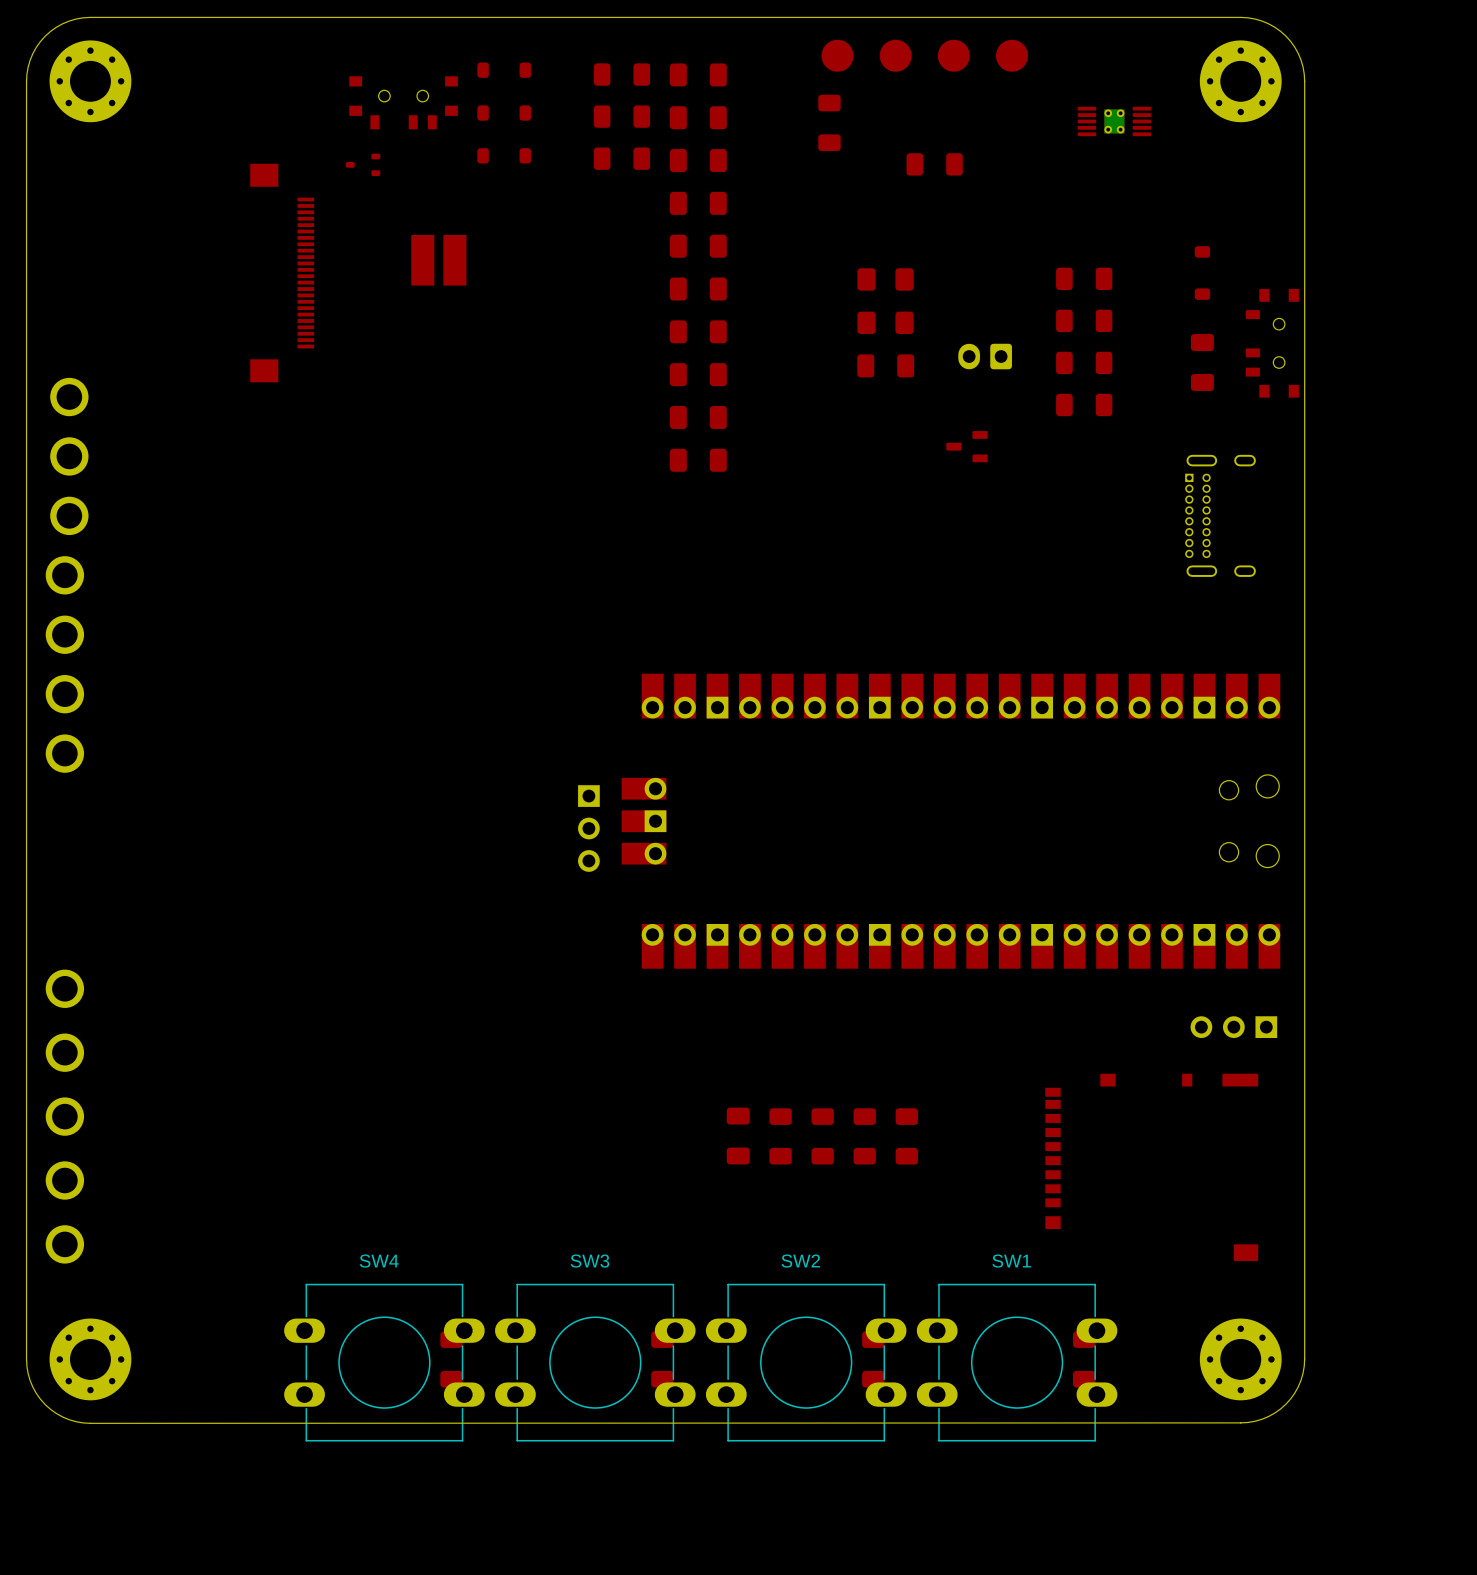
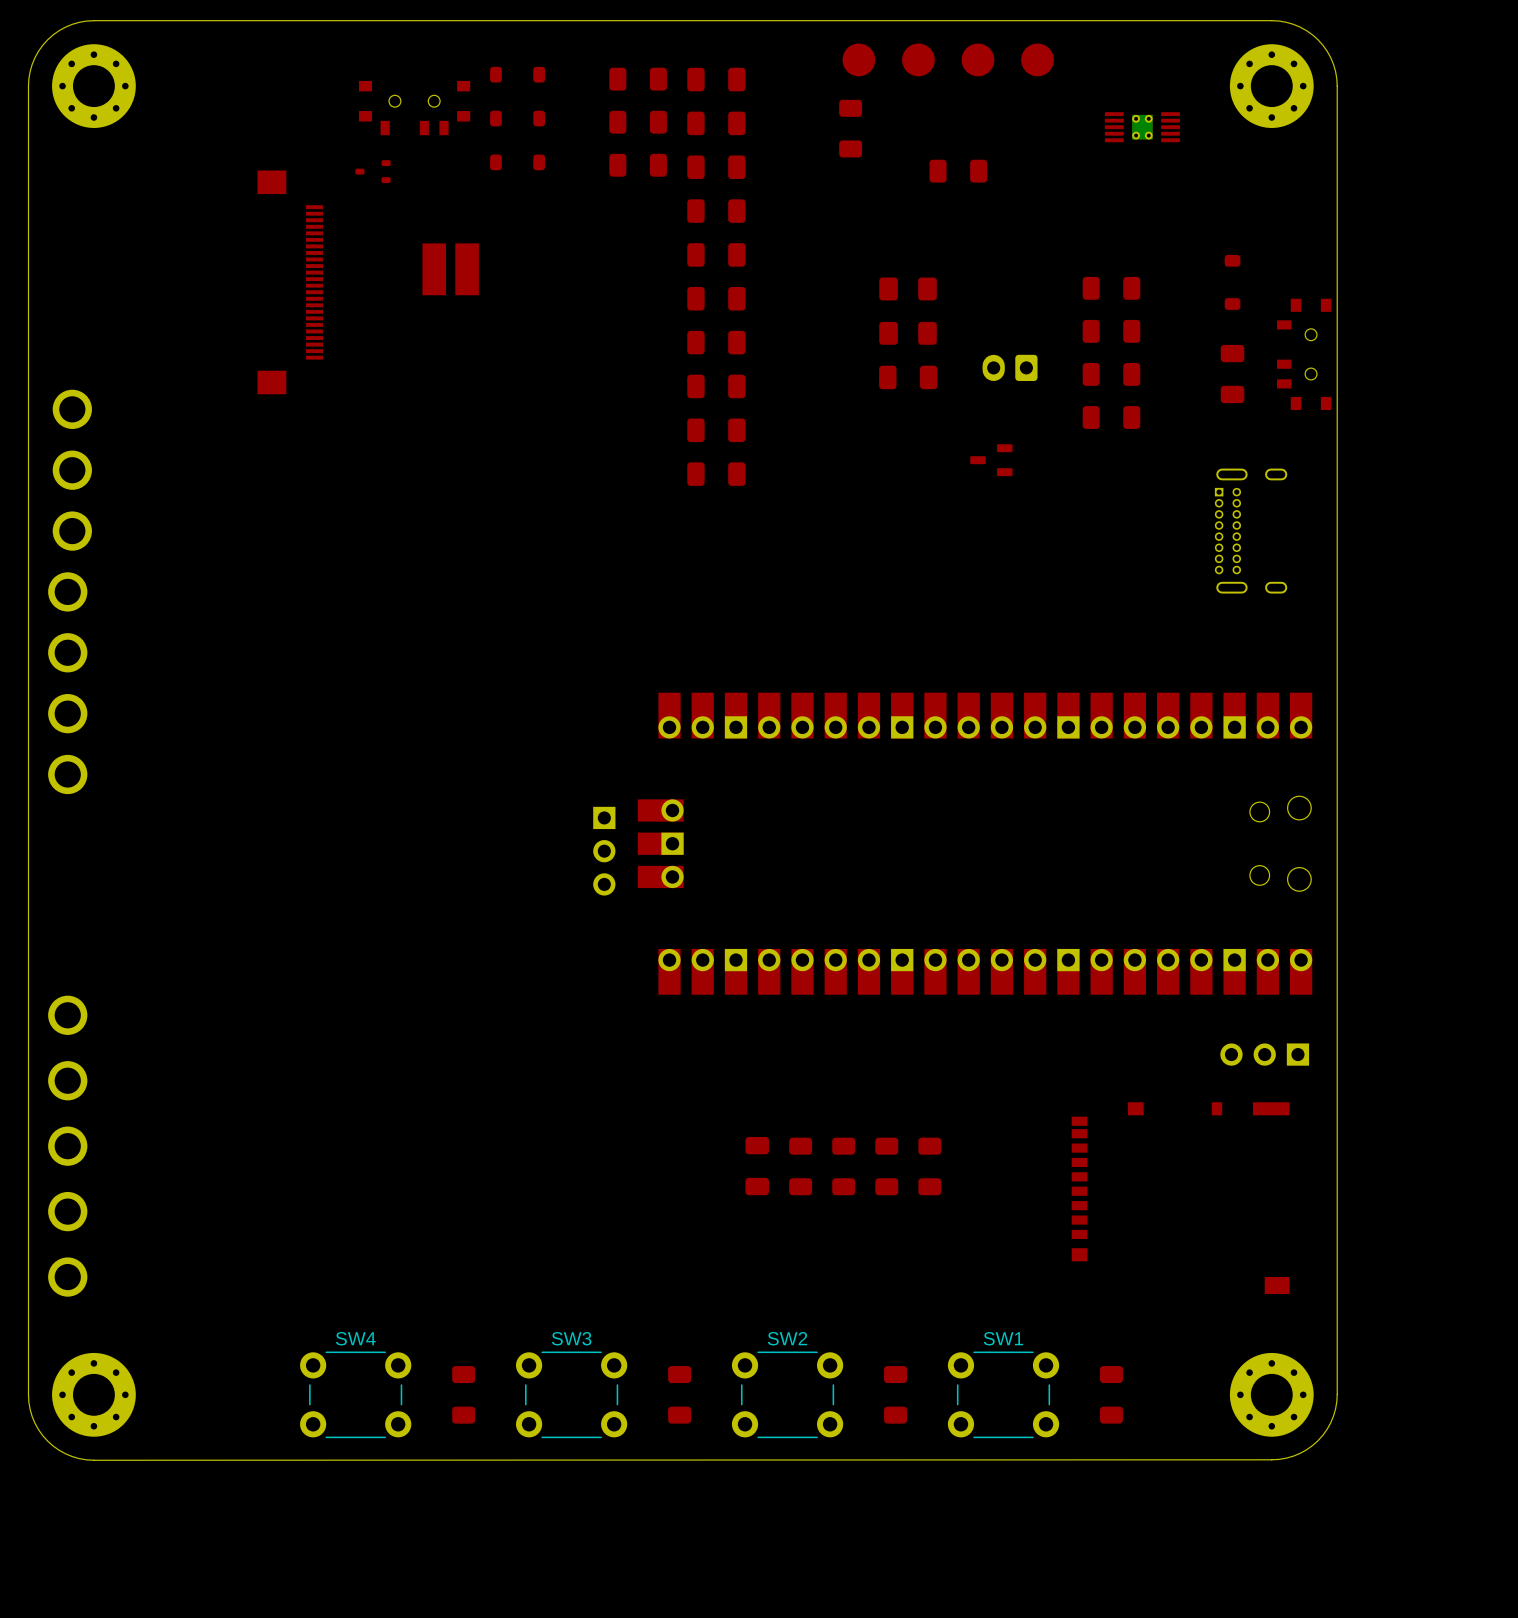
SW4 name position: SW4 (379, 1261) -> SW4 (355, 1338)
SW3 name position: SW3 (589, 1261) -> SW3 (571, 1338)
SW2 name position: SW2 (800, 1261) -> SW2 (787, 1338)
SW1 name position: SW1 (1011, 1261) -> SW1 (1003, 1338)
SW4 footprint: [284, 1283, 485, 1442] -> [300, 1351, 412, 1439]
SW3 footprint: [494, 1283, 696, 1442] -> [515, 1351, 628, 1439]
SW2 footprint: [705, 1283, 907, 1442] -> [731, 1351, 844, 1439]
SW1 footprint: [916, 1283, 1118, 1442] -> [947, 1351, 1060, 1439]

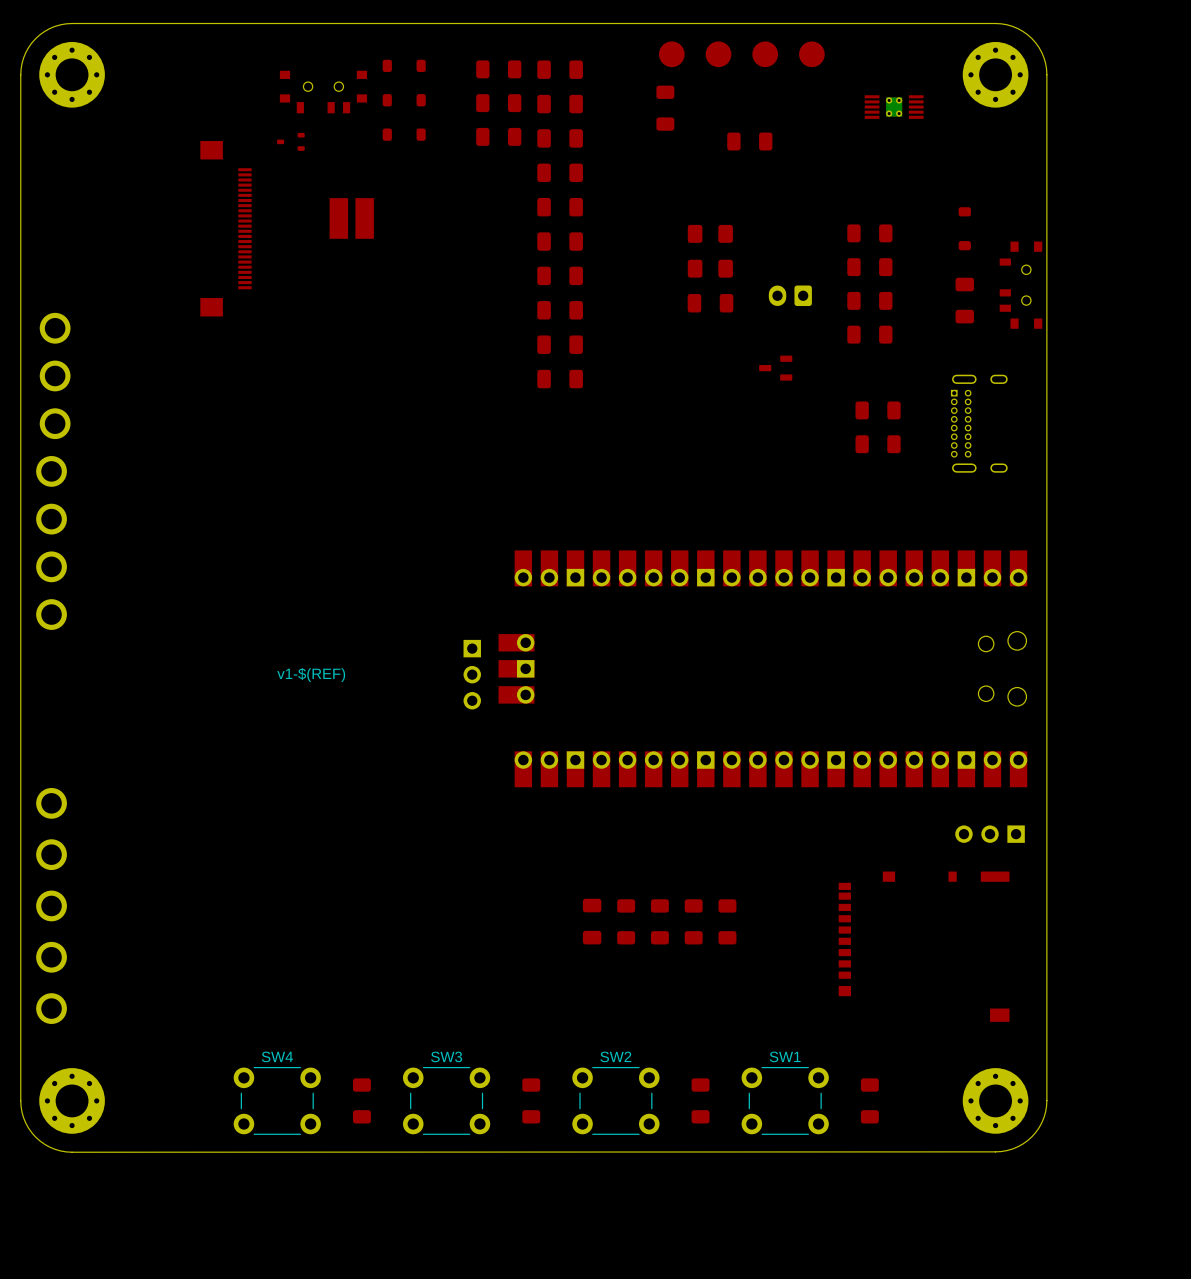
part: none -> (878, 410)
part: none -> (878, 444)
text: none -> v1-$(REF) (311, 674)

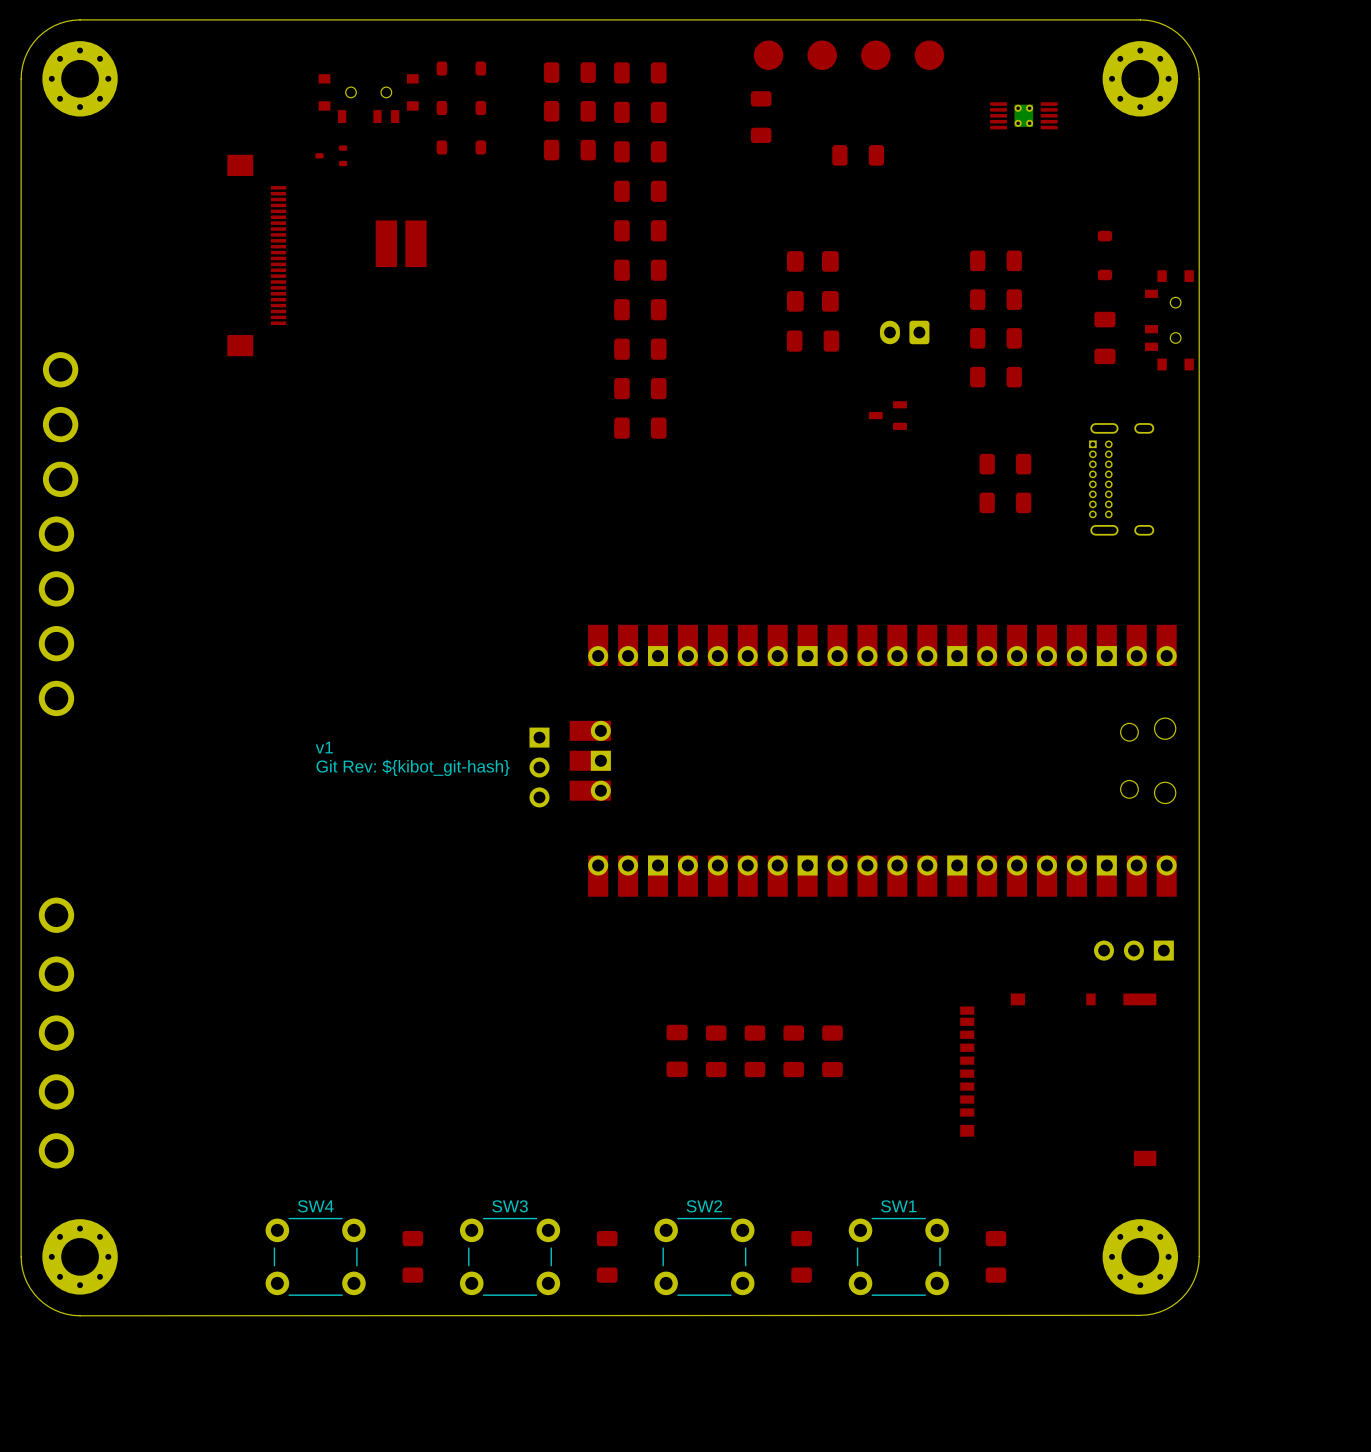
text: none -> v1 (324, 747)
text: v1-$(REF) (311, 674) -> Git Rev: ${kibot_git-hash} (413, 767)

